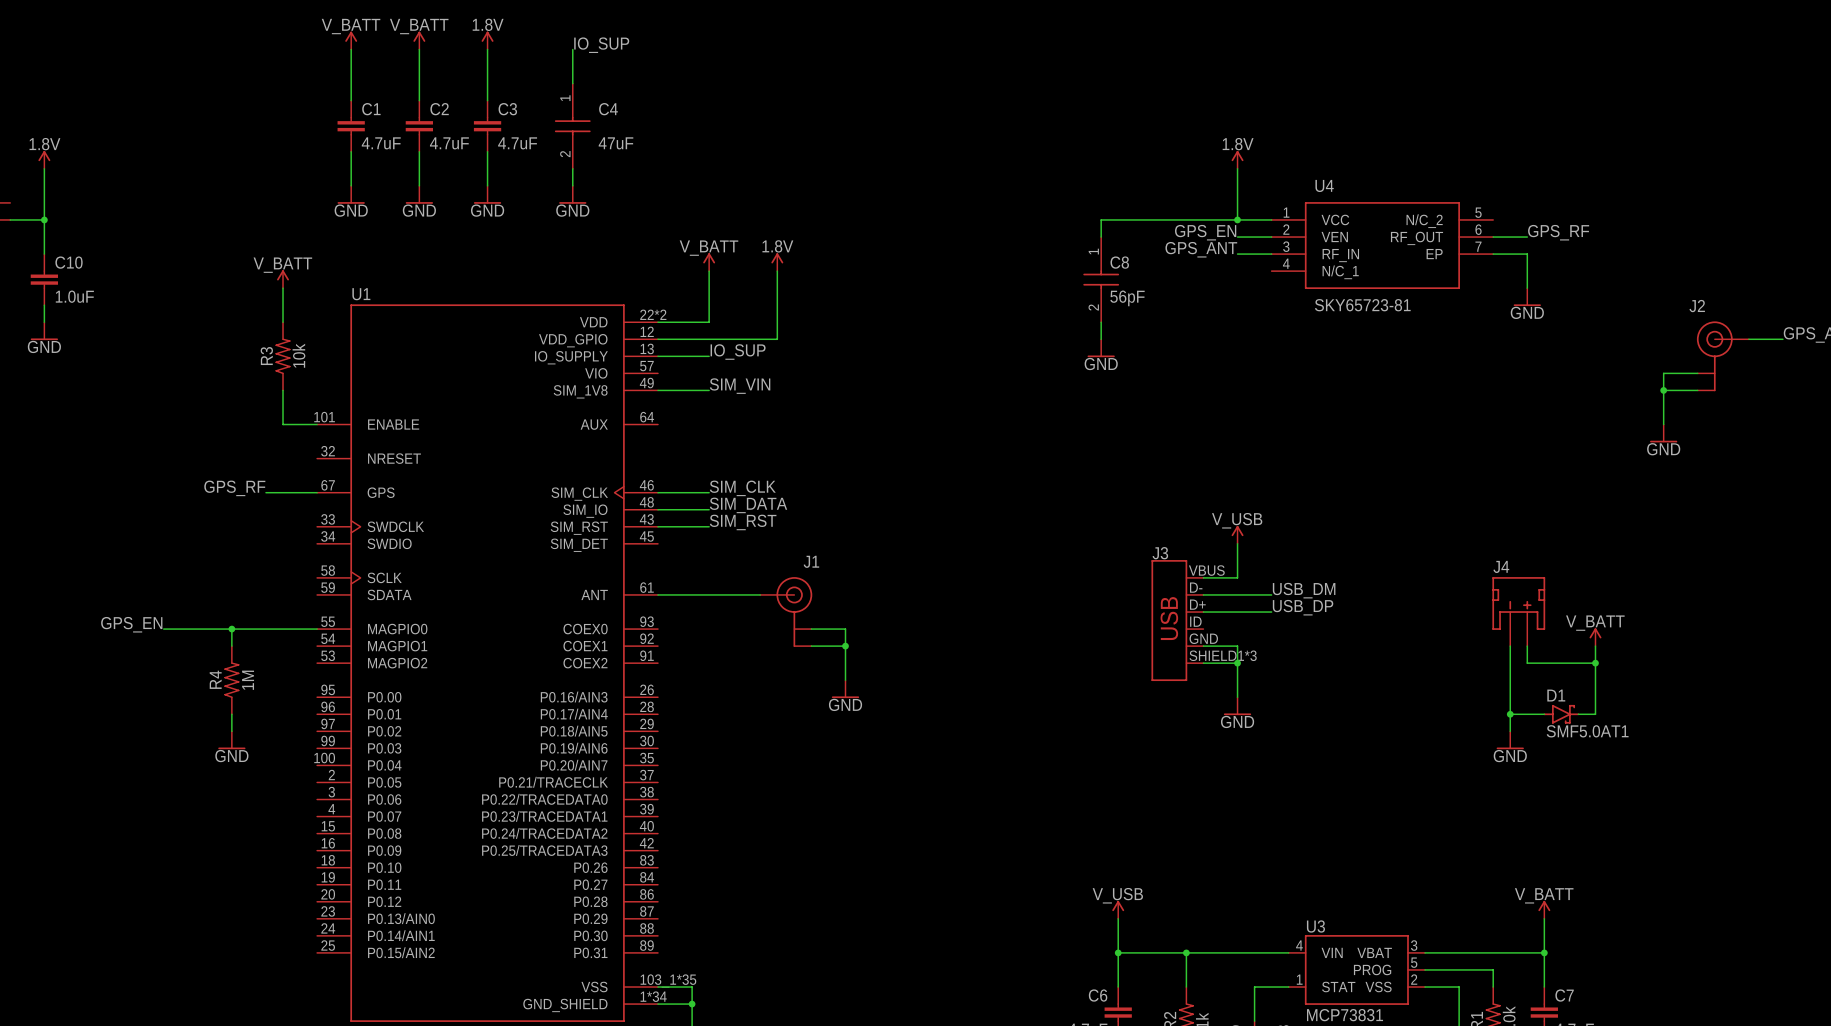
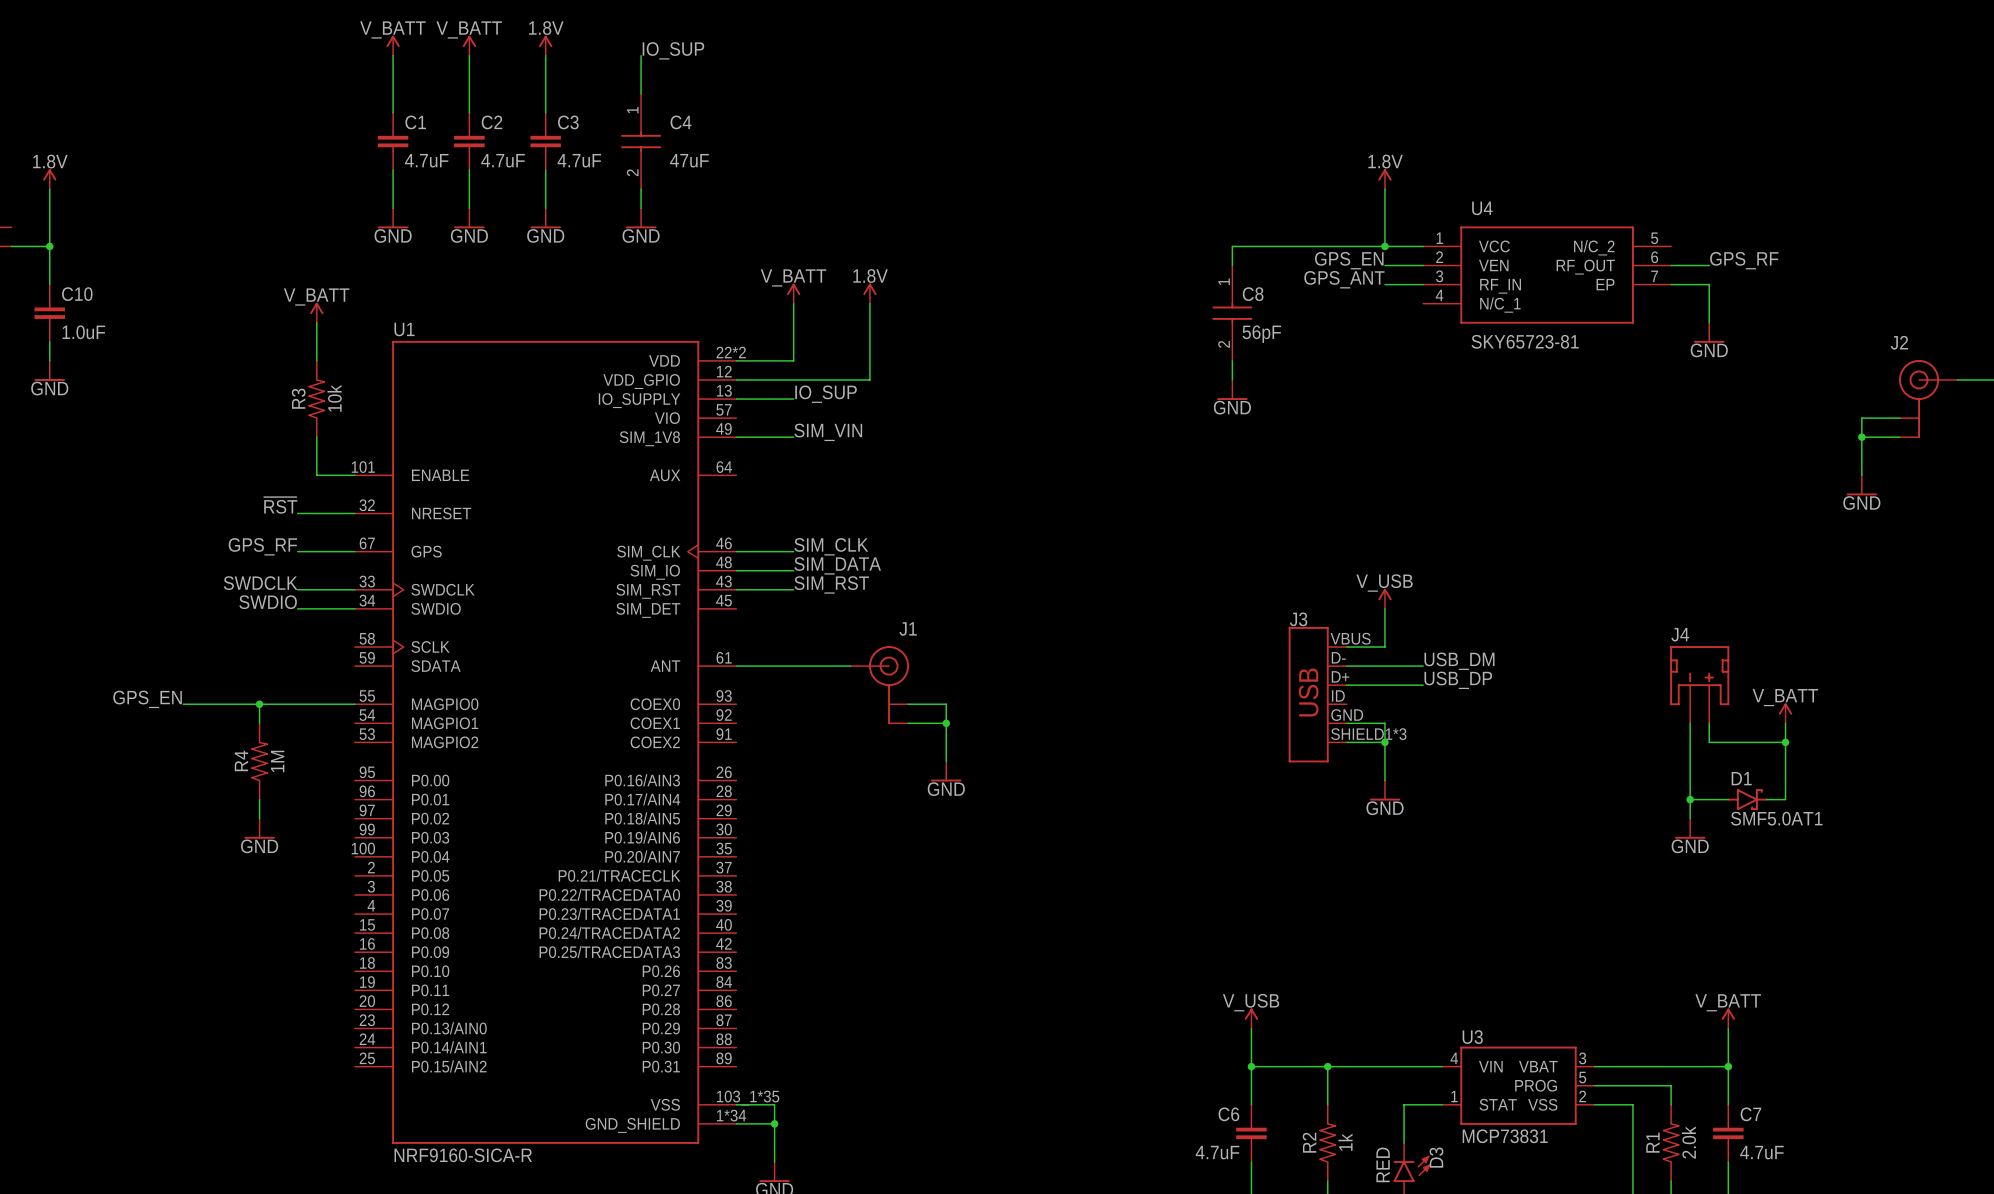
label: none -> ~{RST} (280, 505)
wire: none -> (297, 513) (354, 513)
label: none -> SWDCLK (260, 583)
wire: none -> (297, 589) (354, 589)
label: none -> SWDIO (268, 602)
wire: none -> (297, 608) (354, 608)

